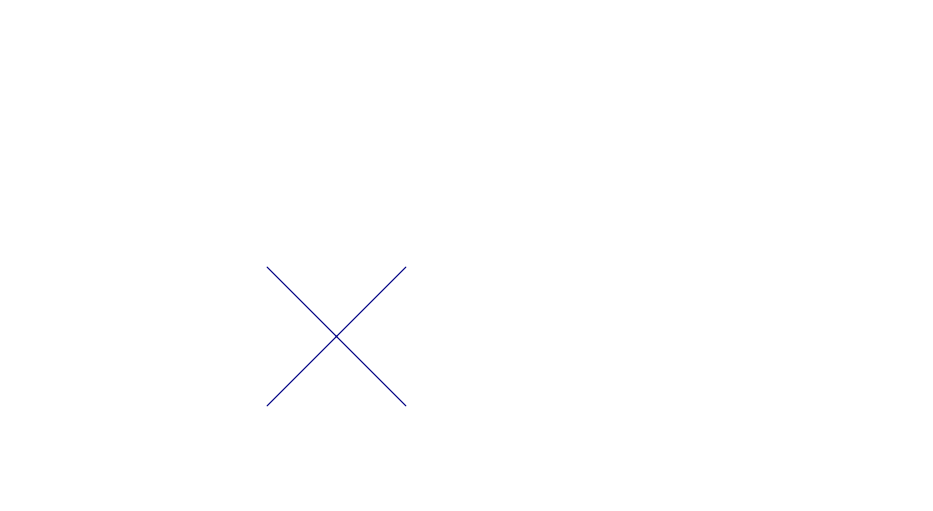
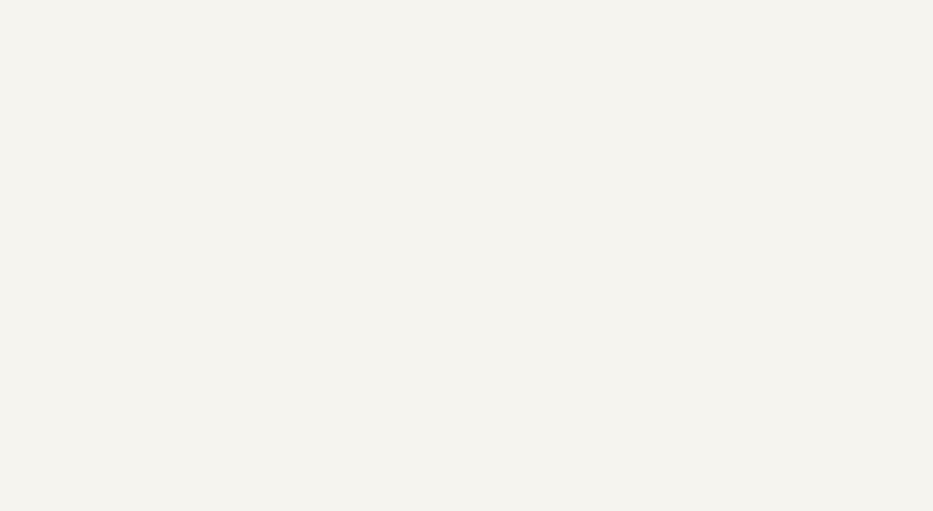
no-connect mark: (336, 336) -> none

